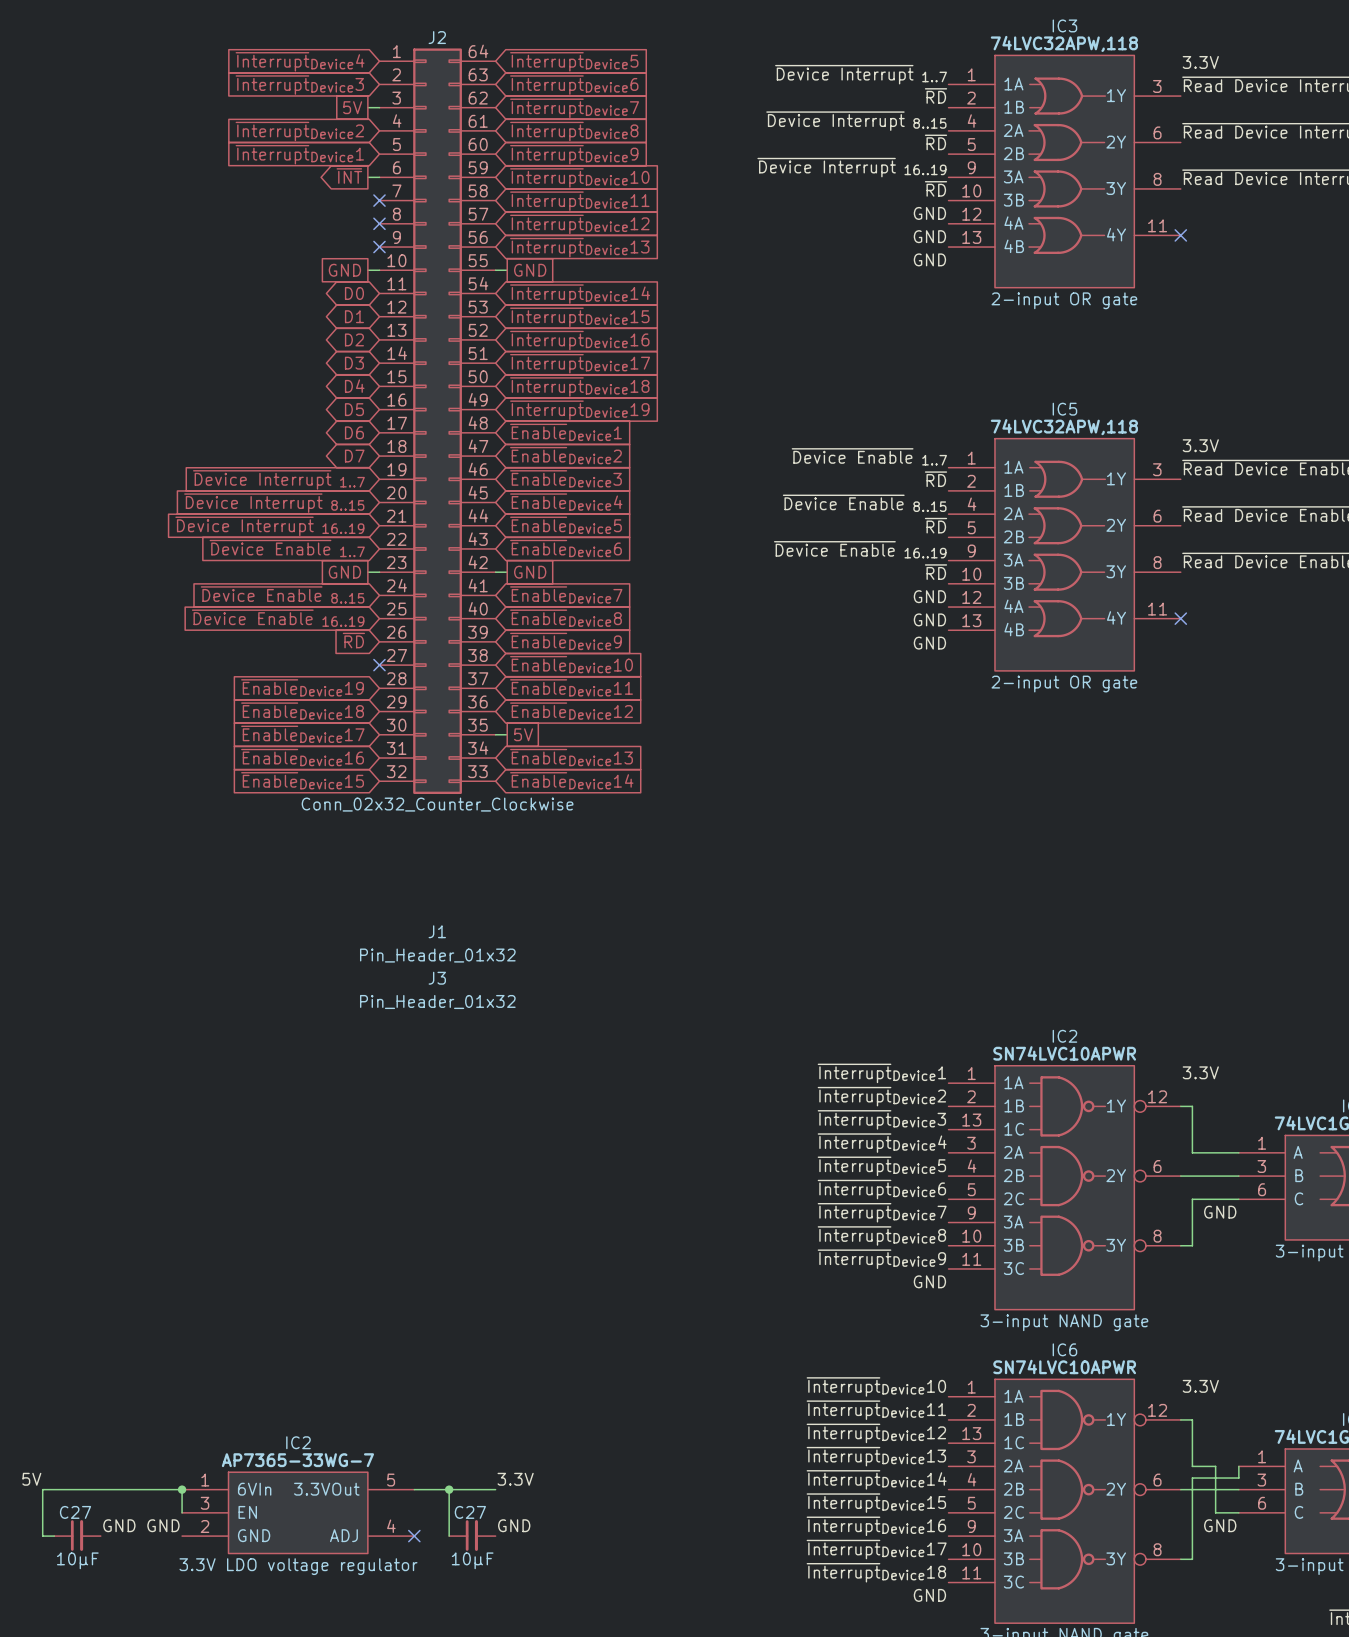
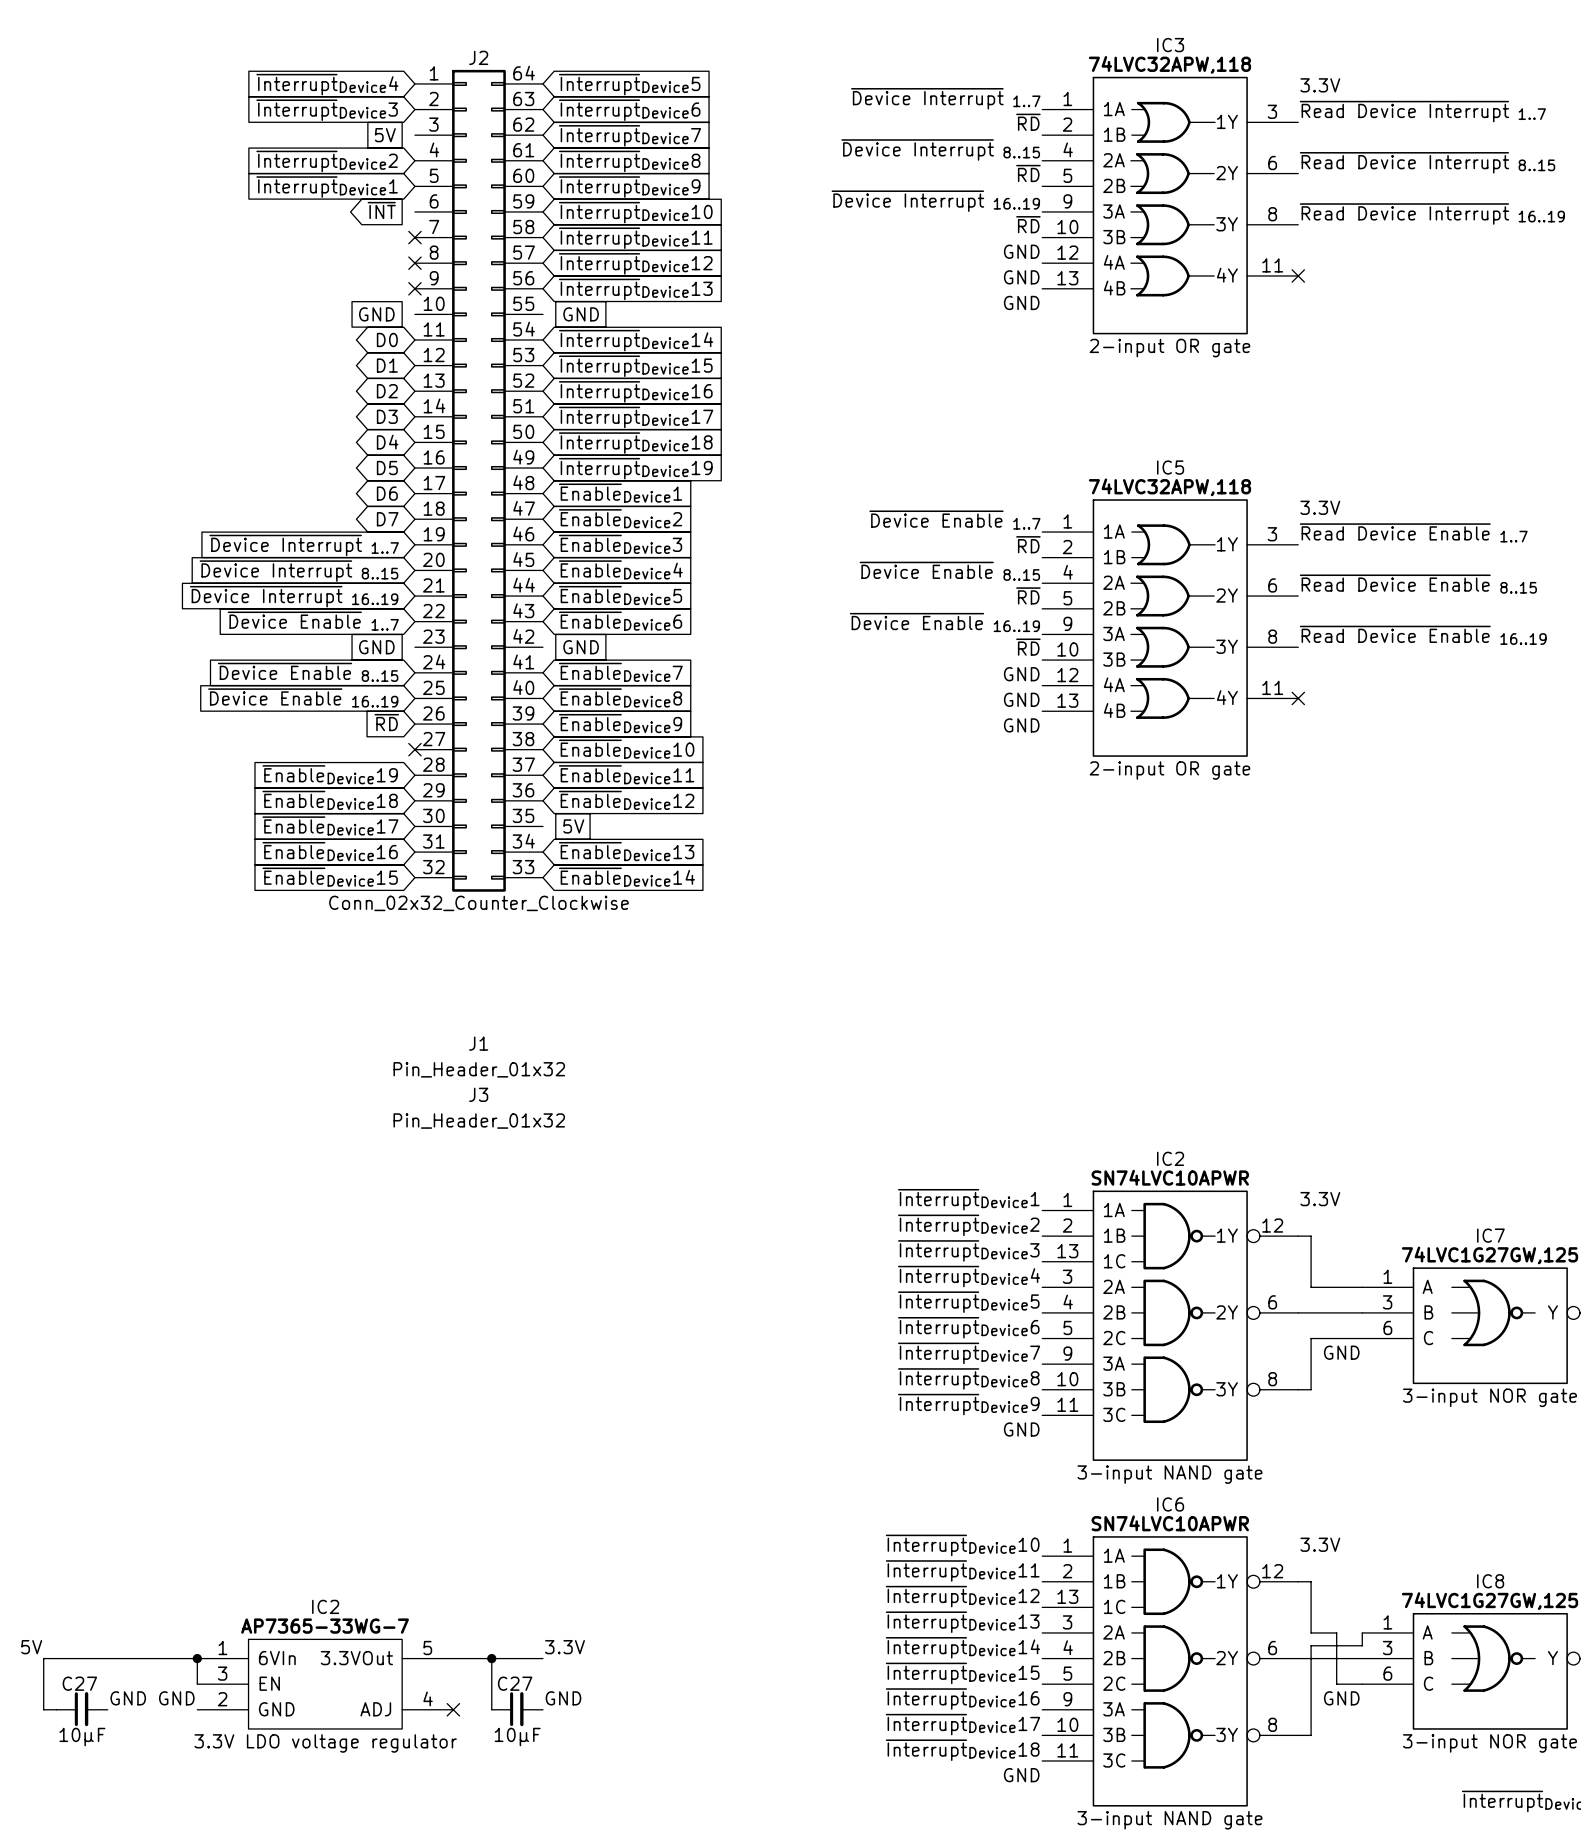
wire: (367, 107) (379, 107) -> none
wire: (367, 177) (379, 177) -> none
wire: (367, 270) (379, 270) -> none
wire: (495, 270) (507, 270) -> none
wire: (367, 572) (379, 572) -> none
wire: (495, 572) (507, 572) -> none
wire: (495, 734) (507, 734) -> none

